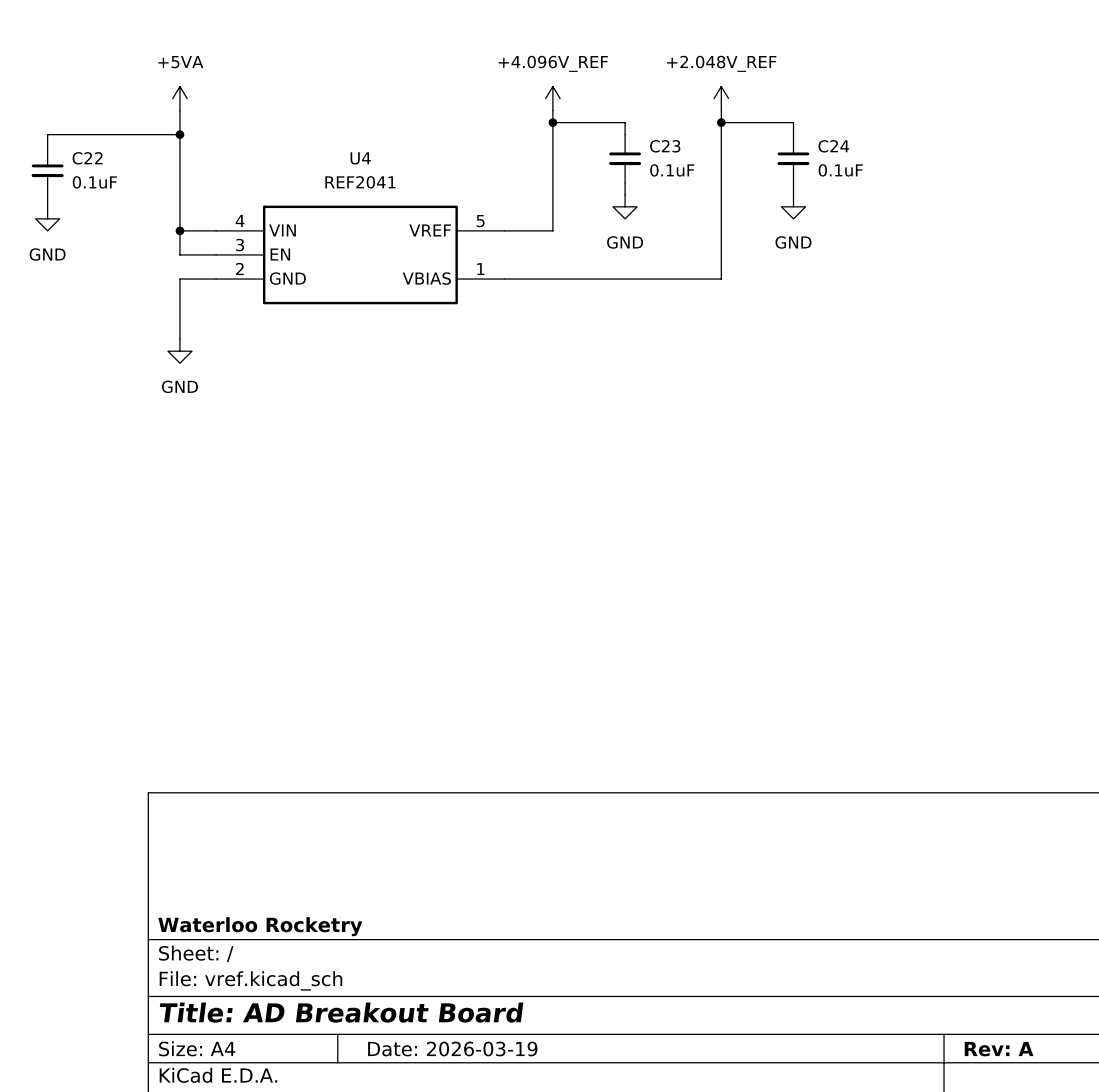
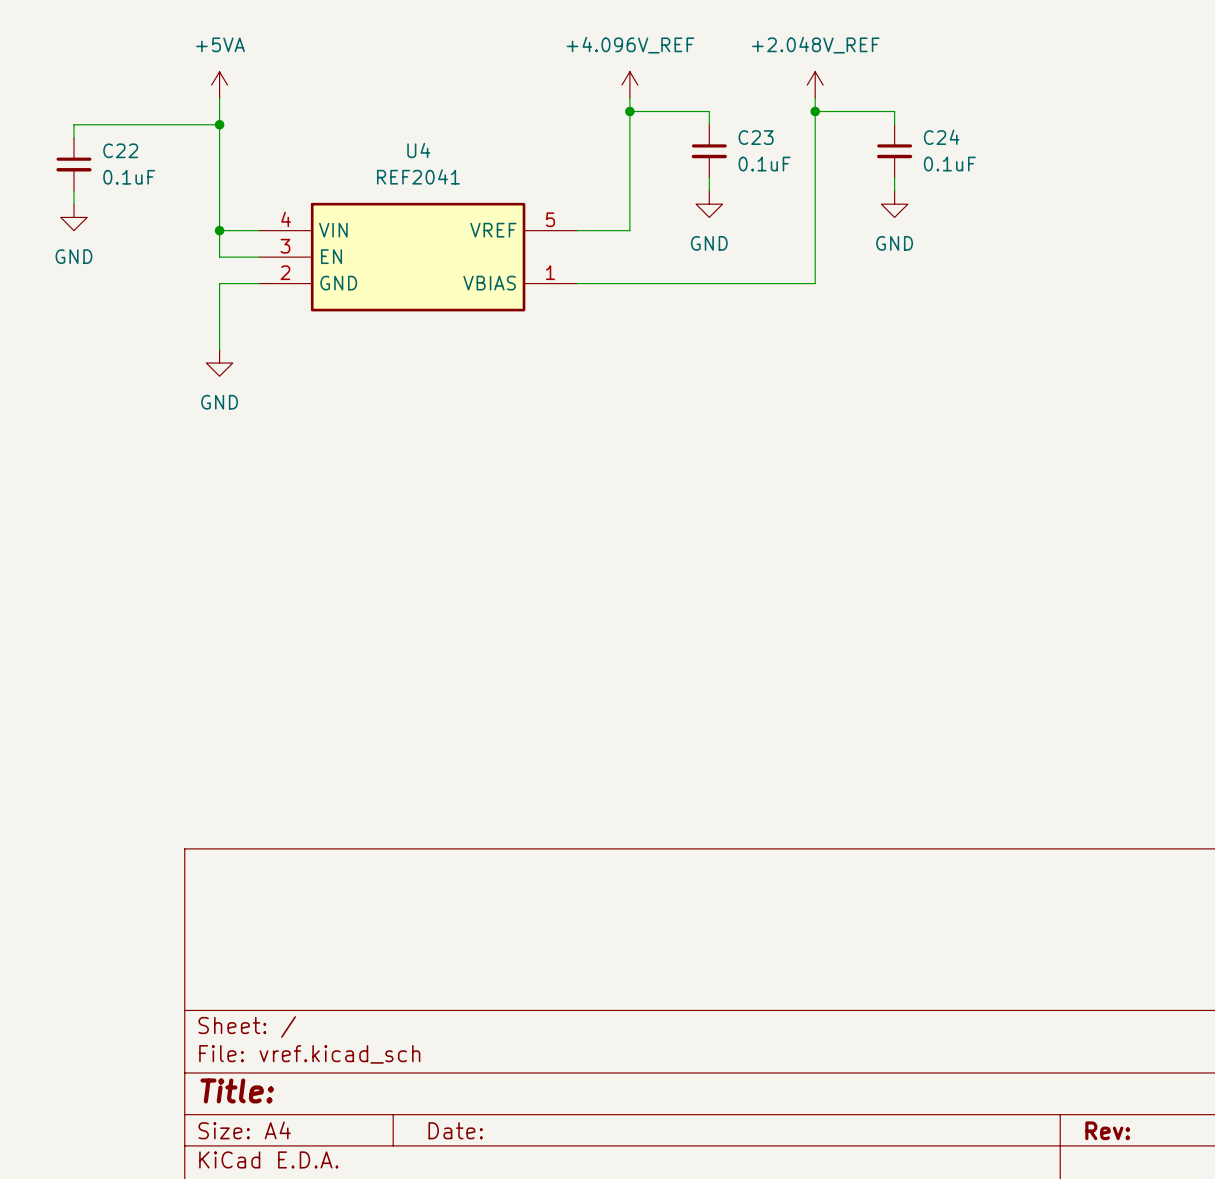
title block: Waterloo Rocketry (260, 926) -> none
title block: Title: AD Breakout Board (341, 1012) -> Title: (237, 1090)
title block: Date: 2026-03-19 (452, 1048) -> Date: (455, 1130)
title block: Rev: A (999, 1049) -> Rev: (1107, 1130)

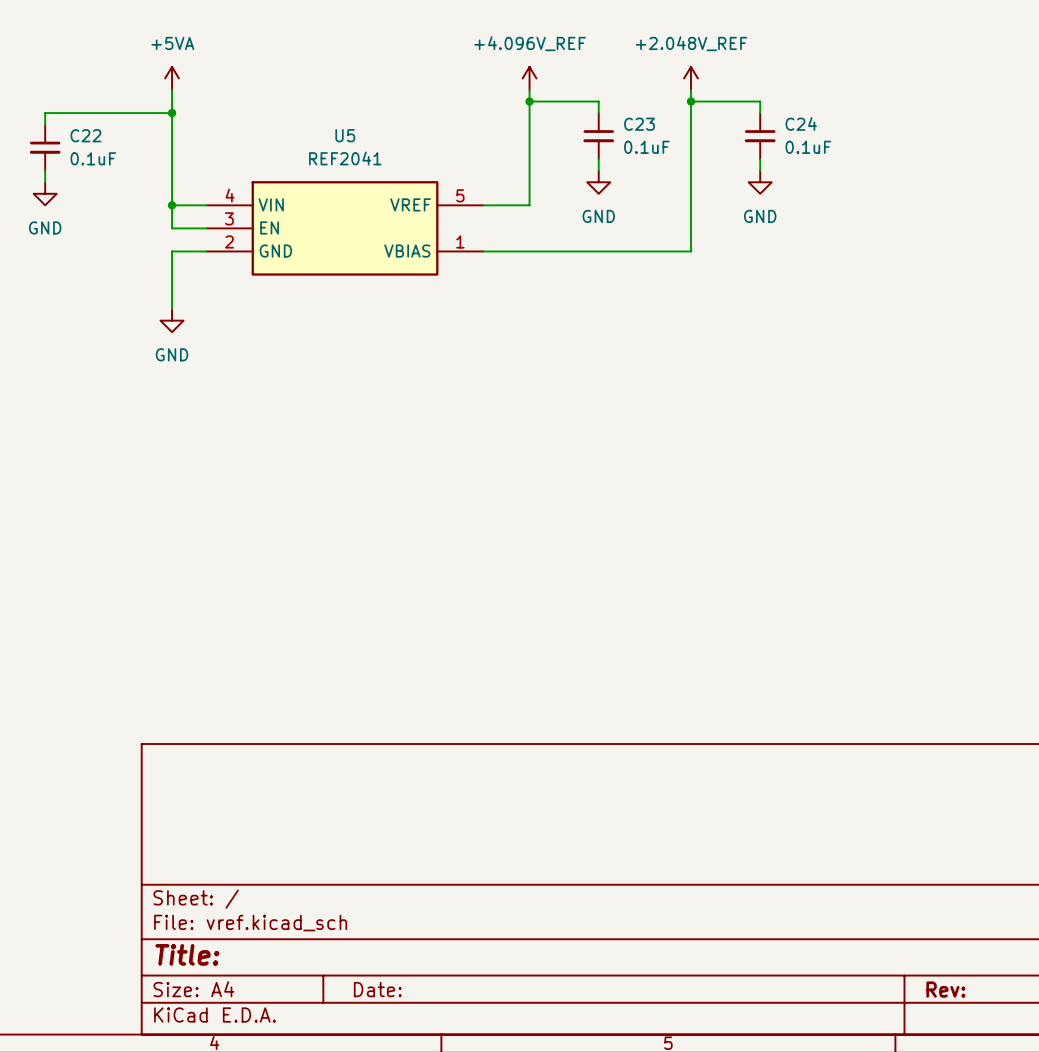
U4 name: U4 (418, 150) -> U5 (345, 135)

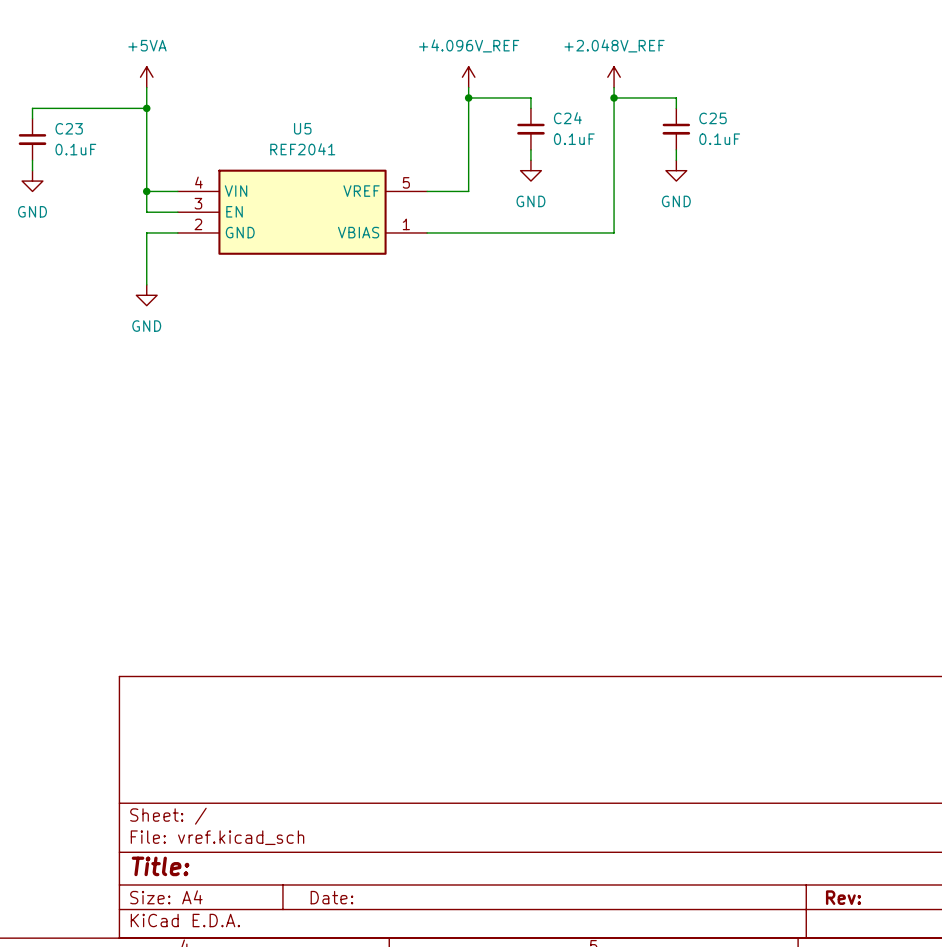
C24 name: C24 (801, 123) -> C25 (713, 118)
C23 name: C23 (639, 124) -> C24 (567, 118)
C22 name: C22 (85, 135) -> C23 (69, 128)

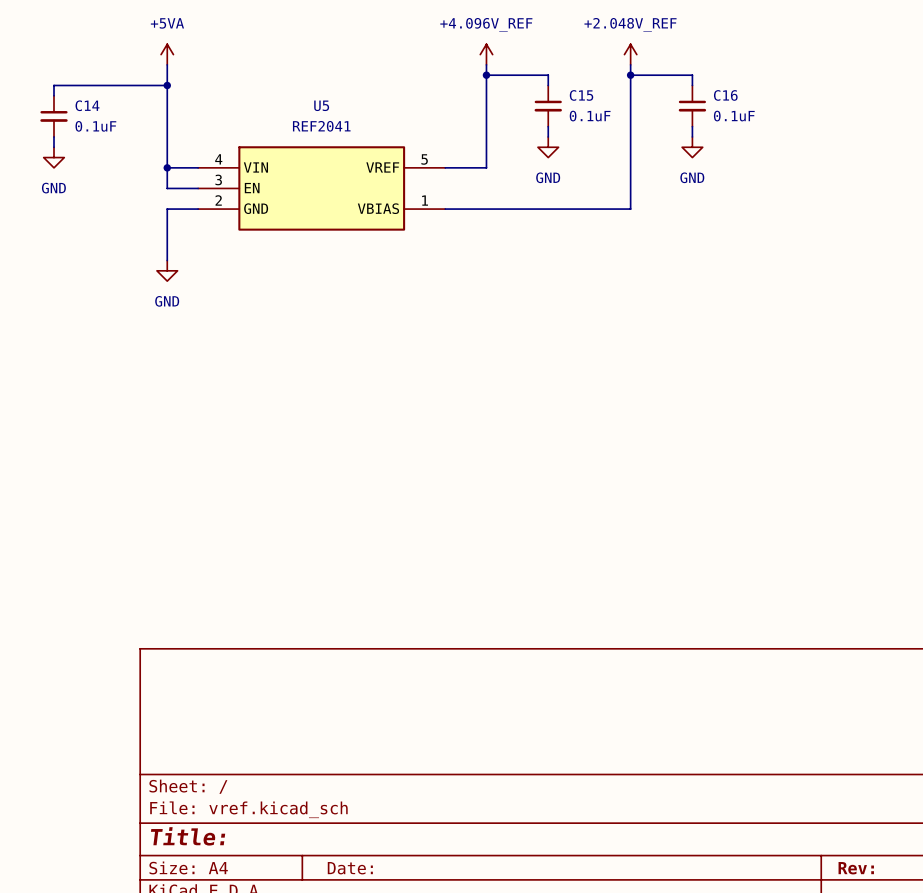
C24 name: C24 (567, 118) -> C15 (581, 95)
C25 name: C25 (713, 118) -> C16 (725, 95)
C23 name: C23 (69, 128) -> C14 (87, 105)

